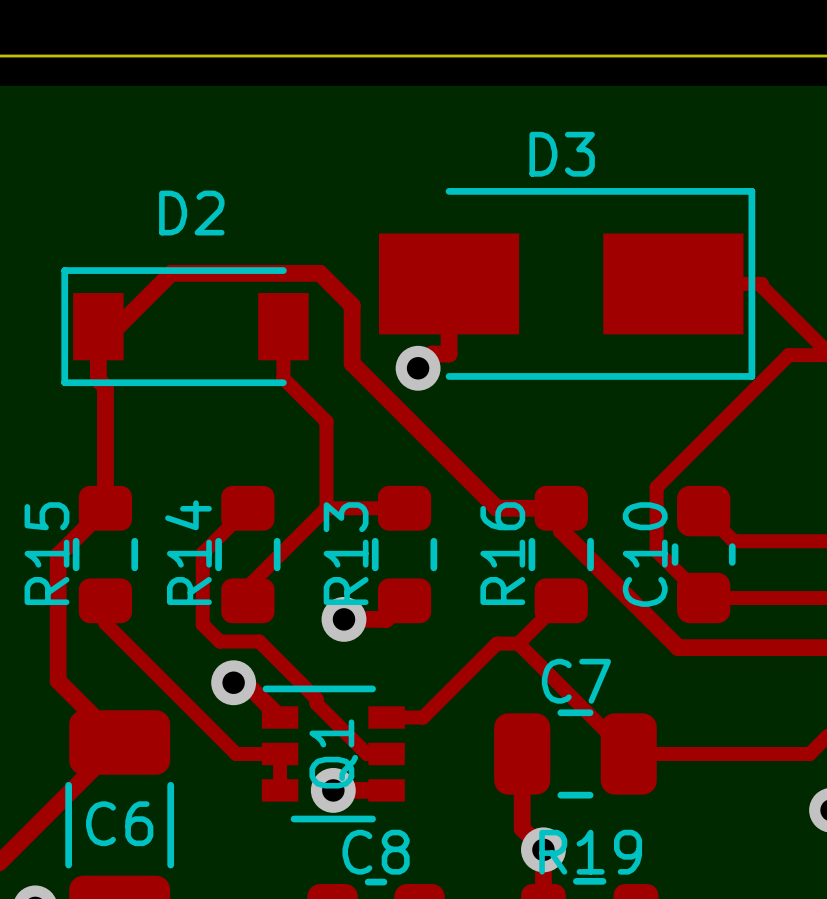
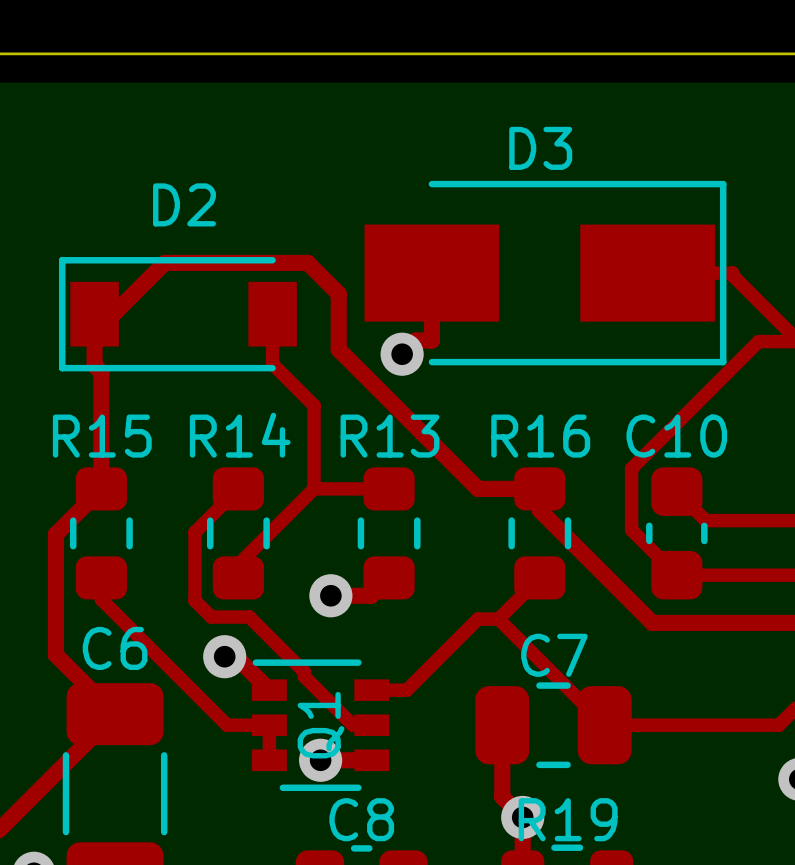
R14 name rotation: 0° (188, 552) -> 90° clockwise (240, 435)
R15 name rotation: 0° (46, 553) -> 90° clockwise (102, 436)
R13 name rotation: 0° (346, 553) -> 90° clockwise (390, 436)
R16 name rotation: 0° (502, 553) -> 90° clockwise (540, 436)
C10 name rotation: 0° (645, 554) -> 90° clockwise (676, 436)
C6 name position: C6 (119, 823) -> C6 (115, 648)

